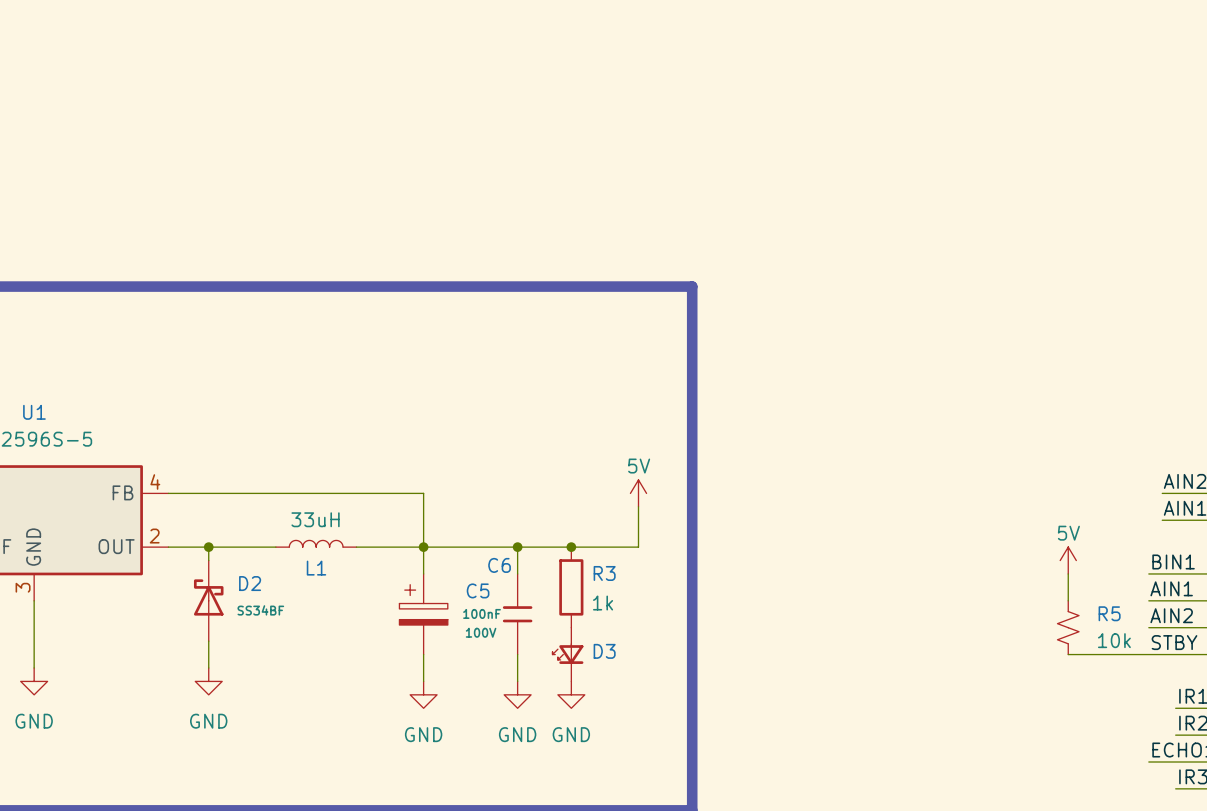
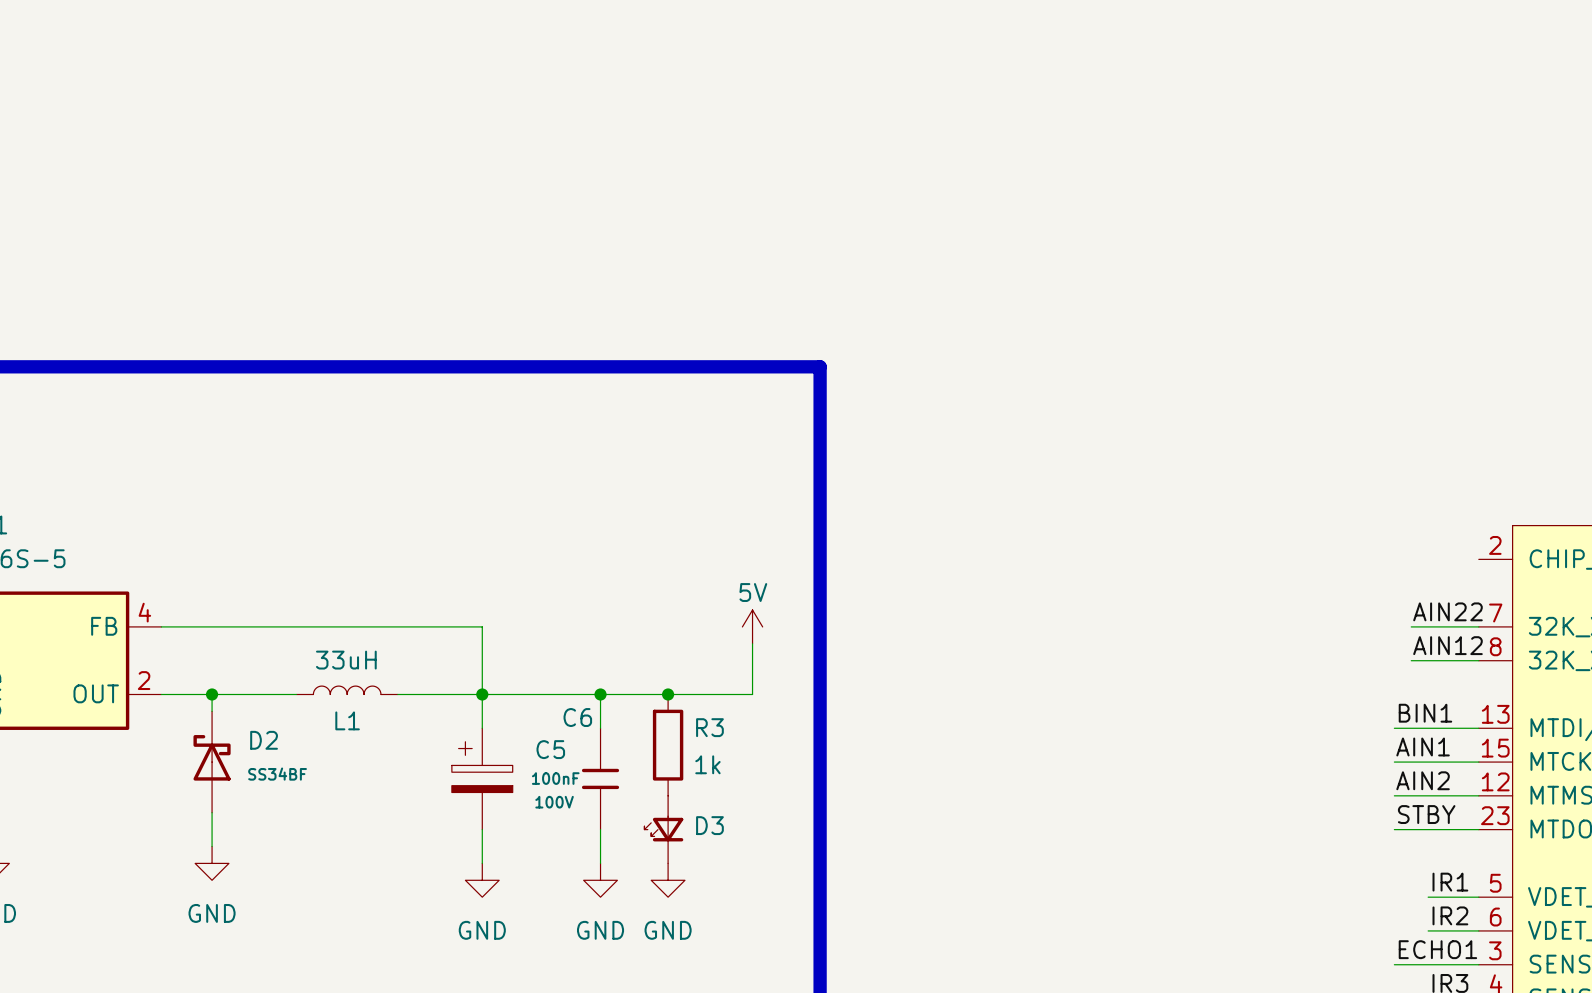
power symbol: 5V (1068, 560) -> none
wire: (1068, 573) (1068, 600) -> none
R5: 10k (1068, 627) -> none
wire: (1068, 654) (1148, 654) -> none

